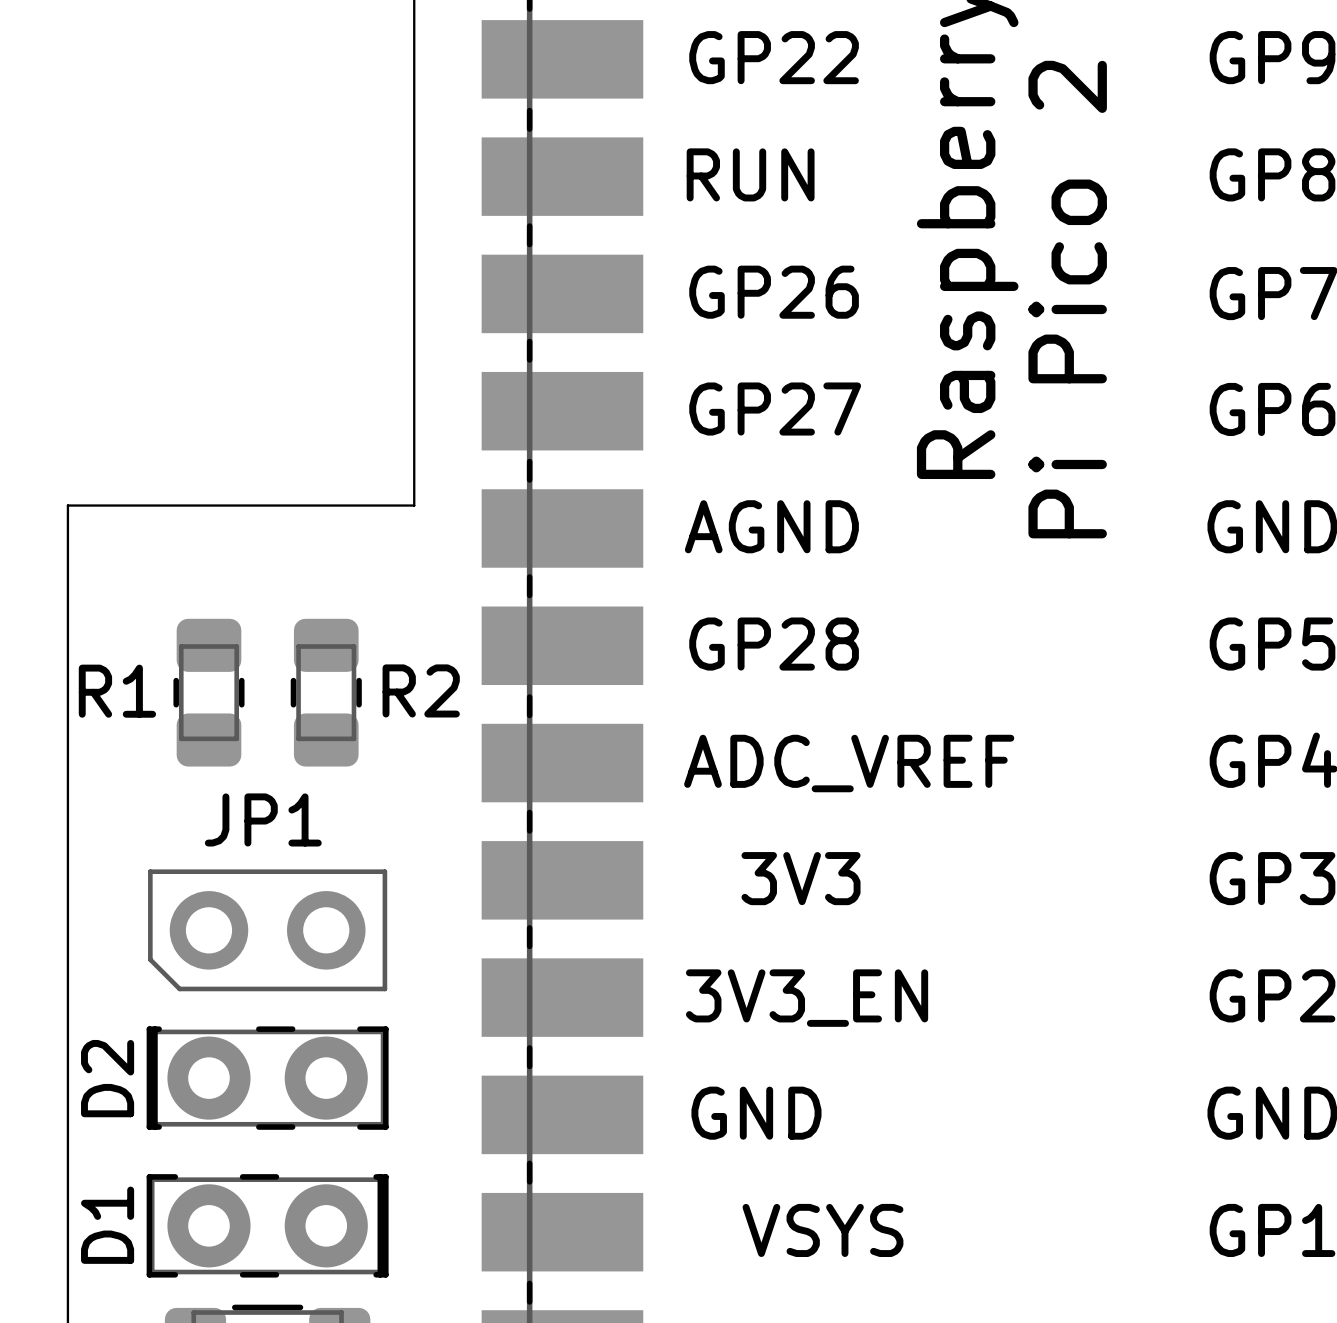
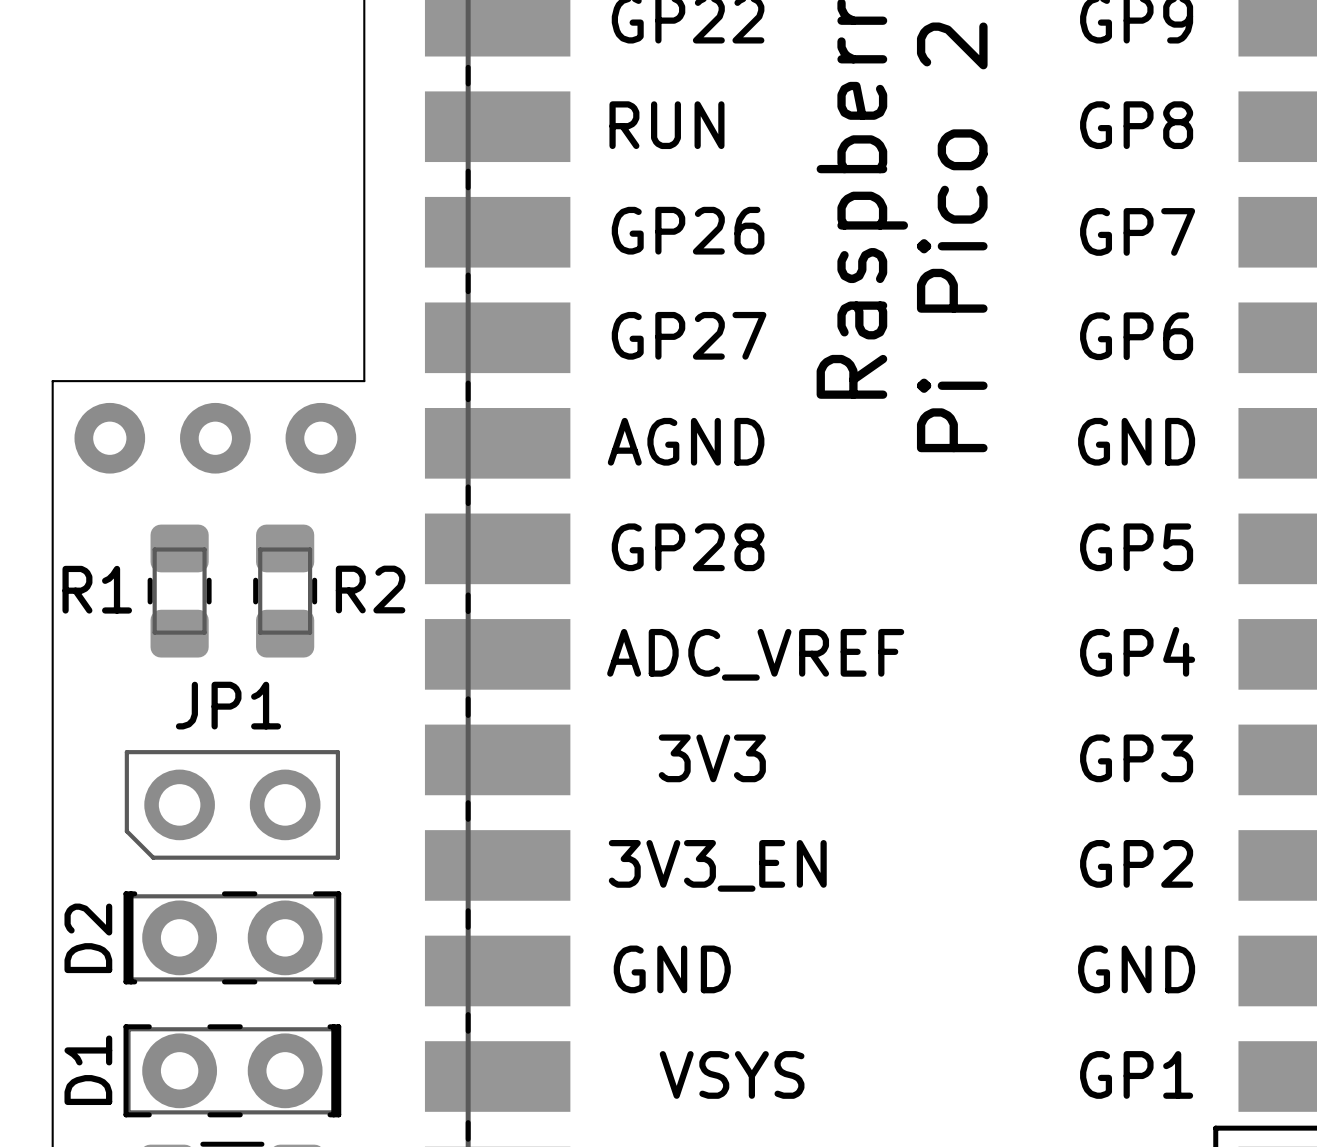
board edge: (414, 459) (414, 505) (67, 505) -> (364, 381) (52, 381) (52, 422)
part: none -> (215, 438)

